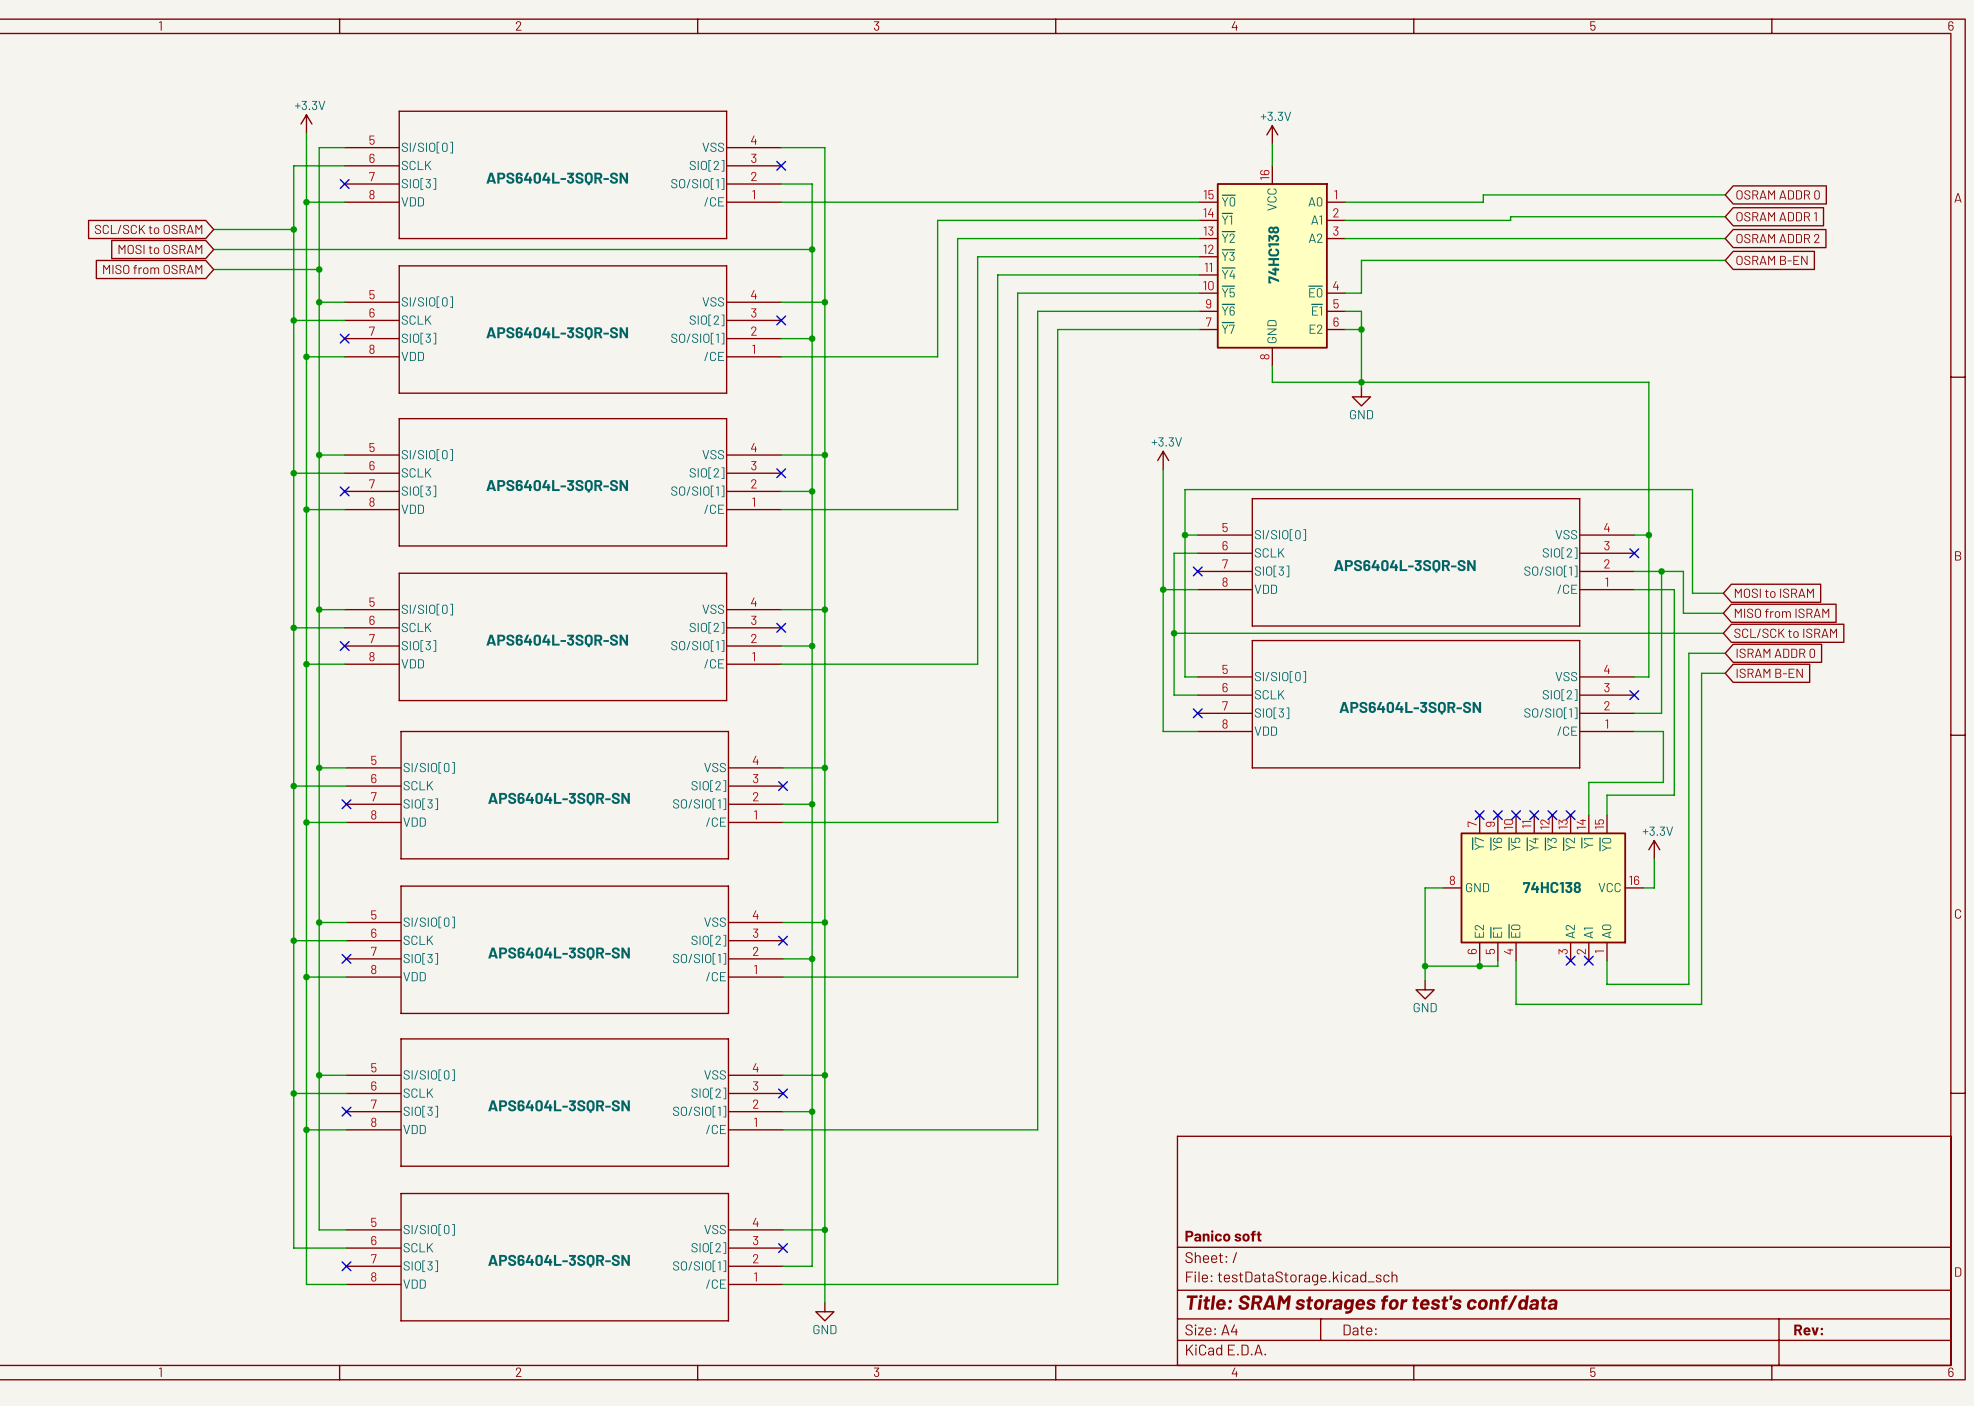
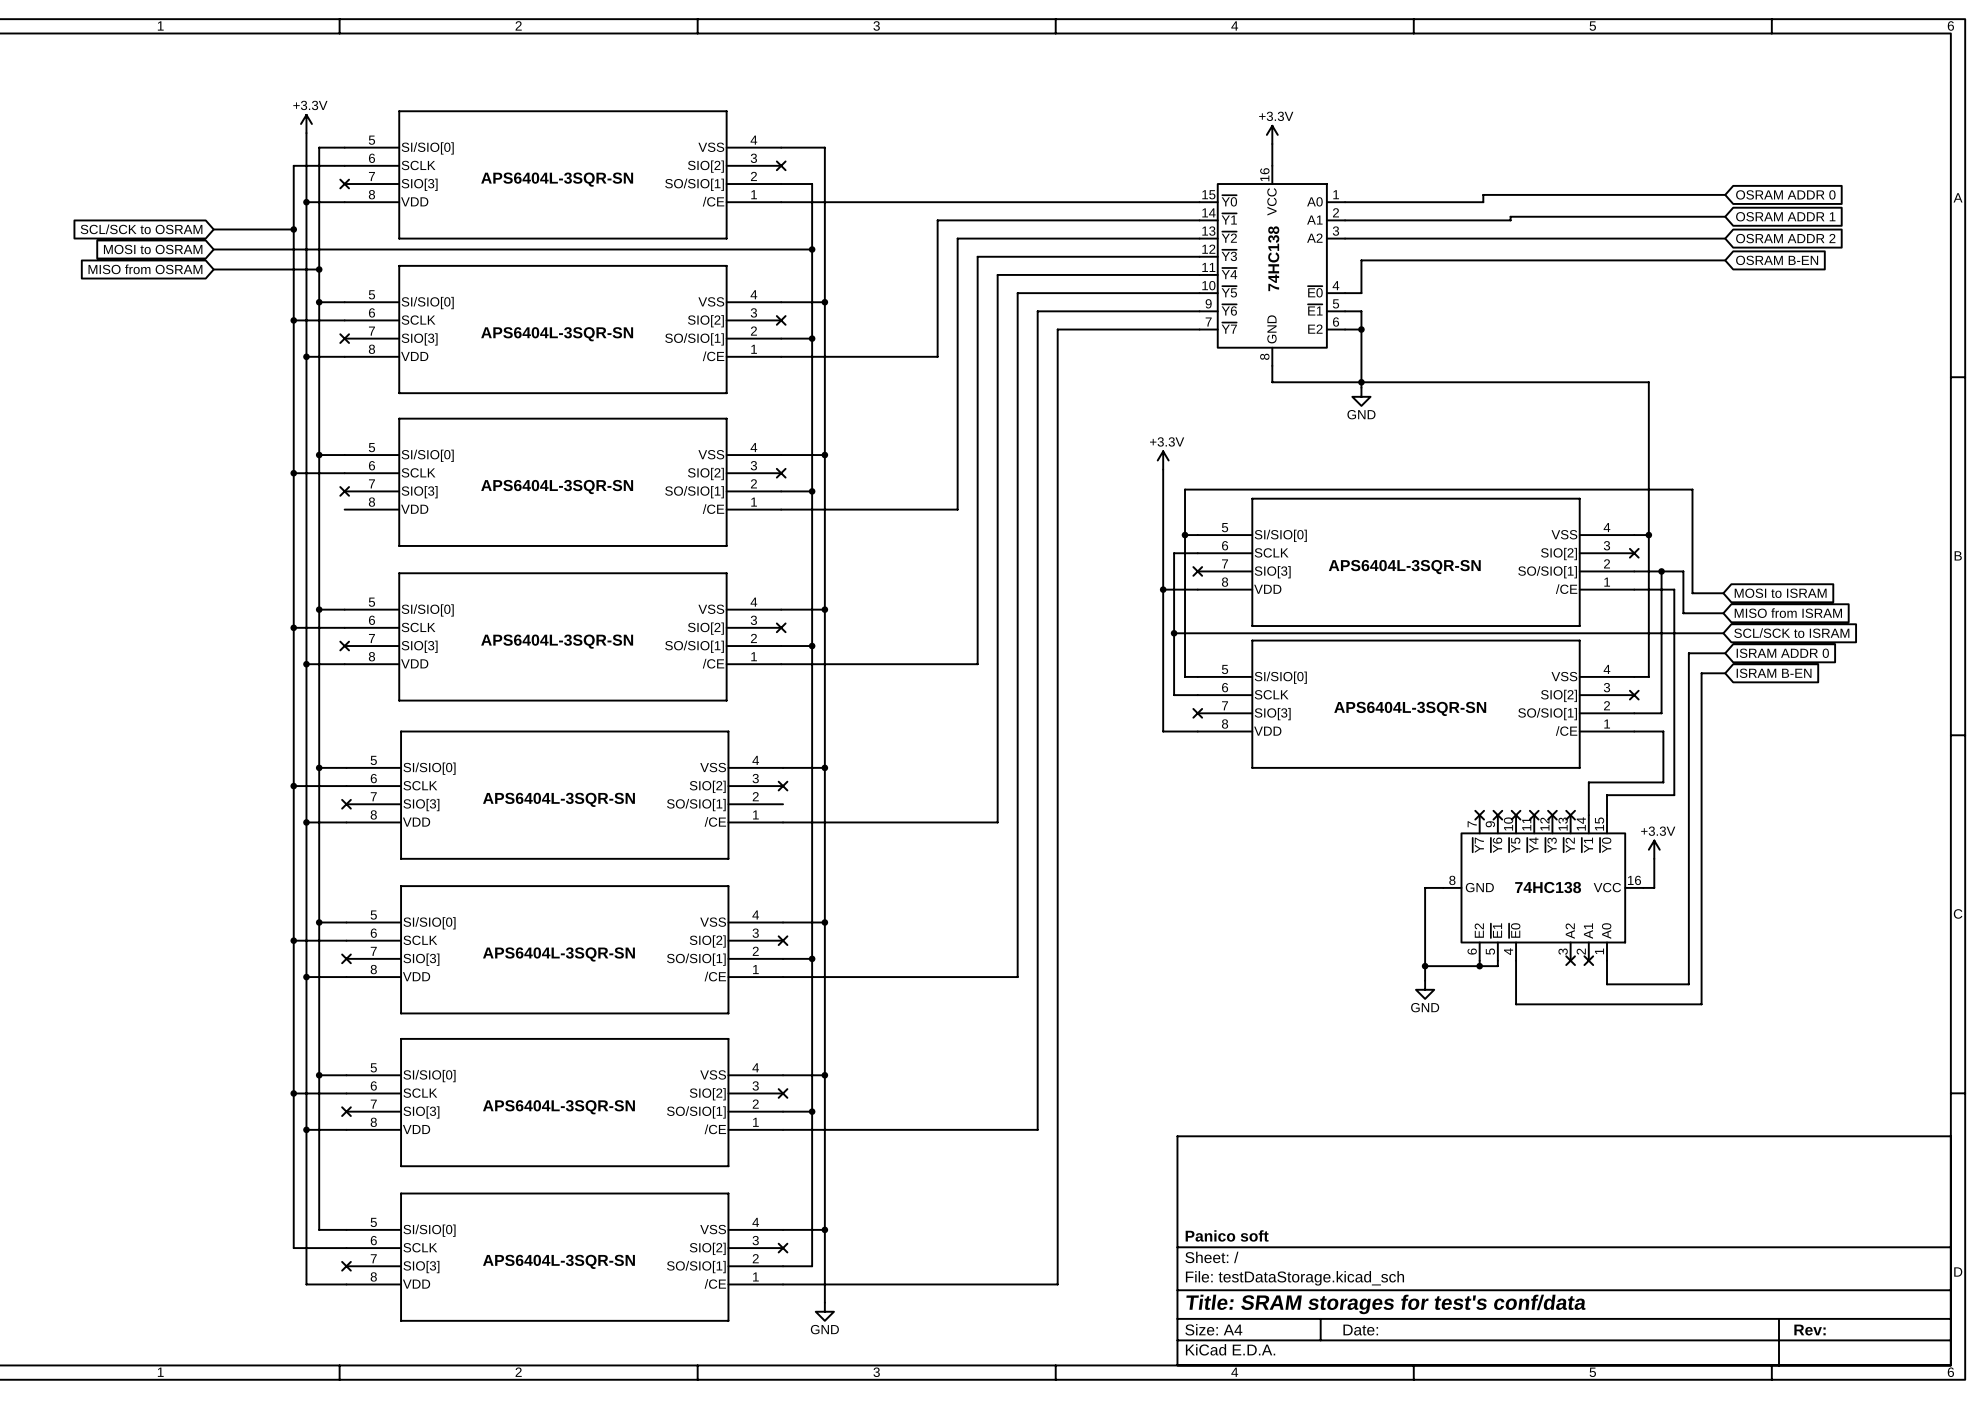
wire: (306, 509) (344, 509) -> none
junction: (306, 509) -> none
wire: (783, 804) (812, 804) -> none
junction: (812, 804) -> none

